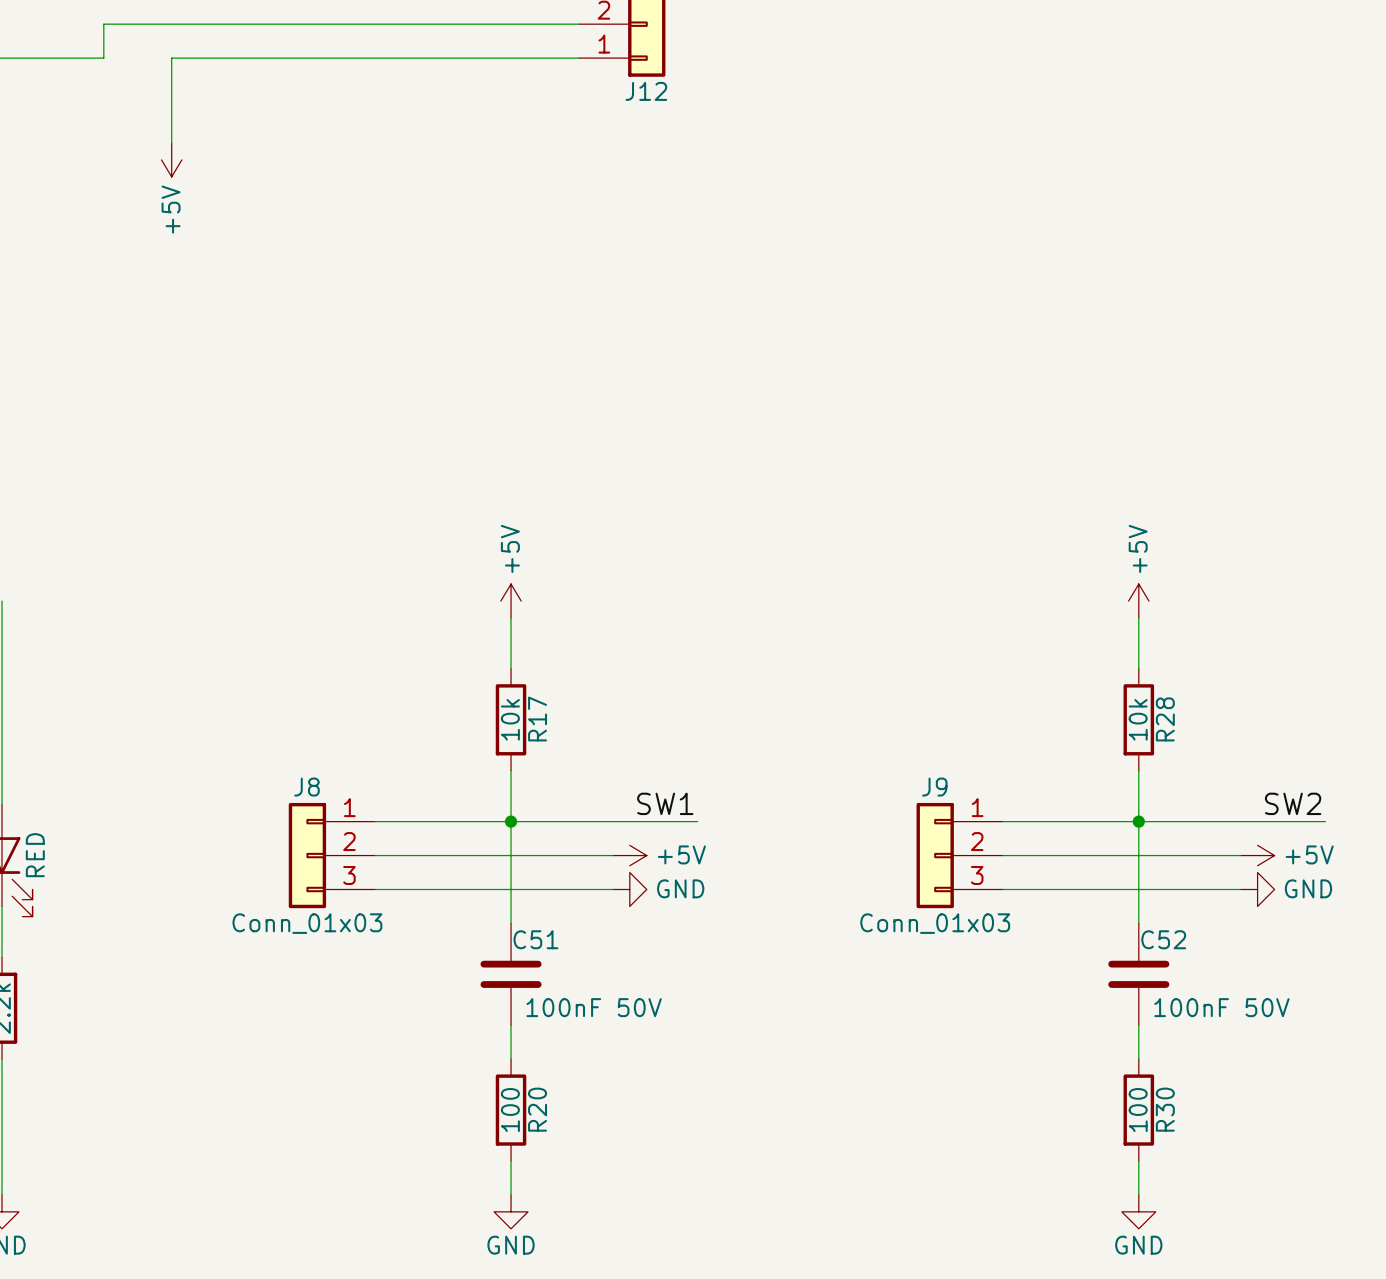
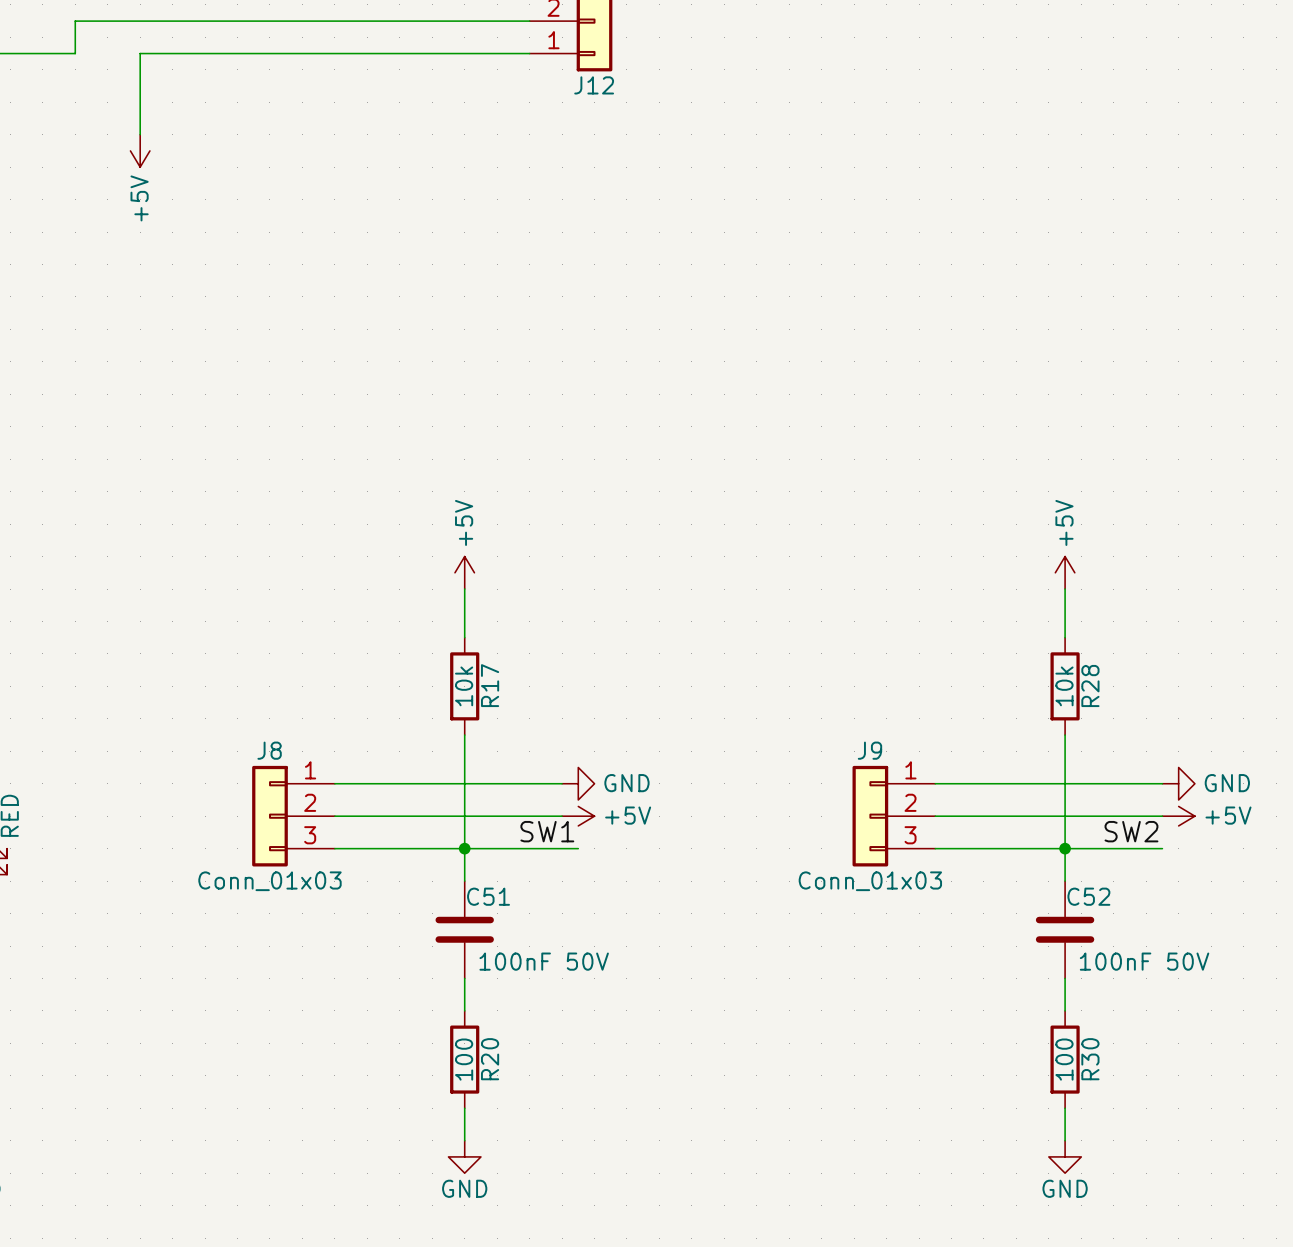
label position: SW1 (665, 803) -> SW1 (547, 831)
label position: SW2 (1293, 803) -> SW2 (1131, 831)
junction position: (511, 821) -> (464, 848)
wire: (612, 821) (697, 821) -> none
junction position: (1138, 821) -> (1065, 848)
wire: (1240, 821) (1325, 821) -> none
power symbol position: GND (629, 889) -> GND (578, 783)
power symbol position: GND (1257, 889) -> GND (1178, 783)

